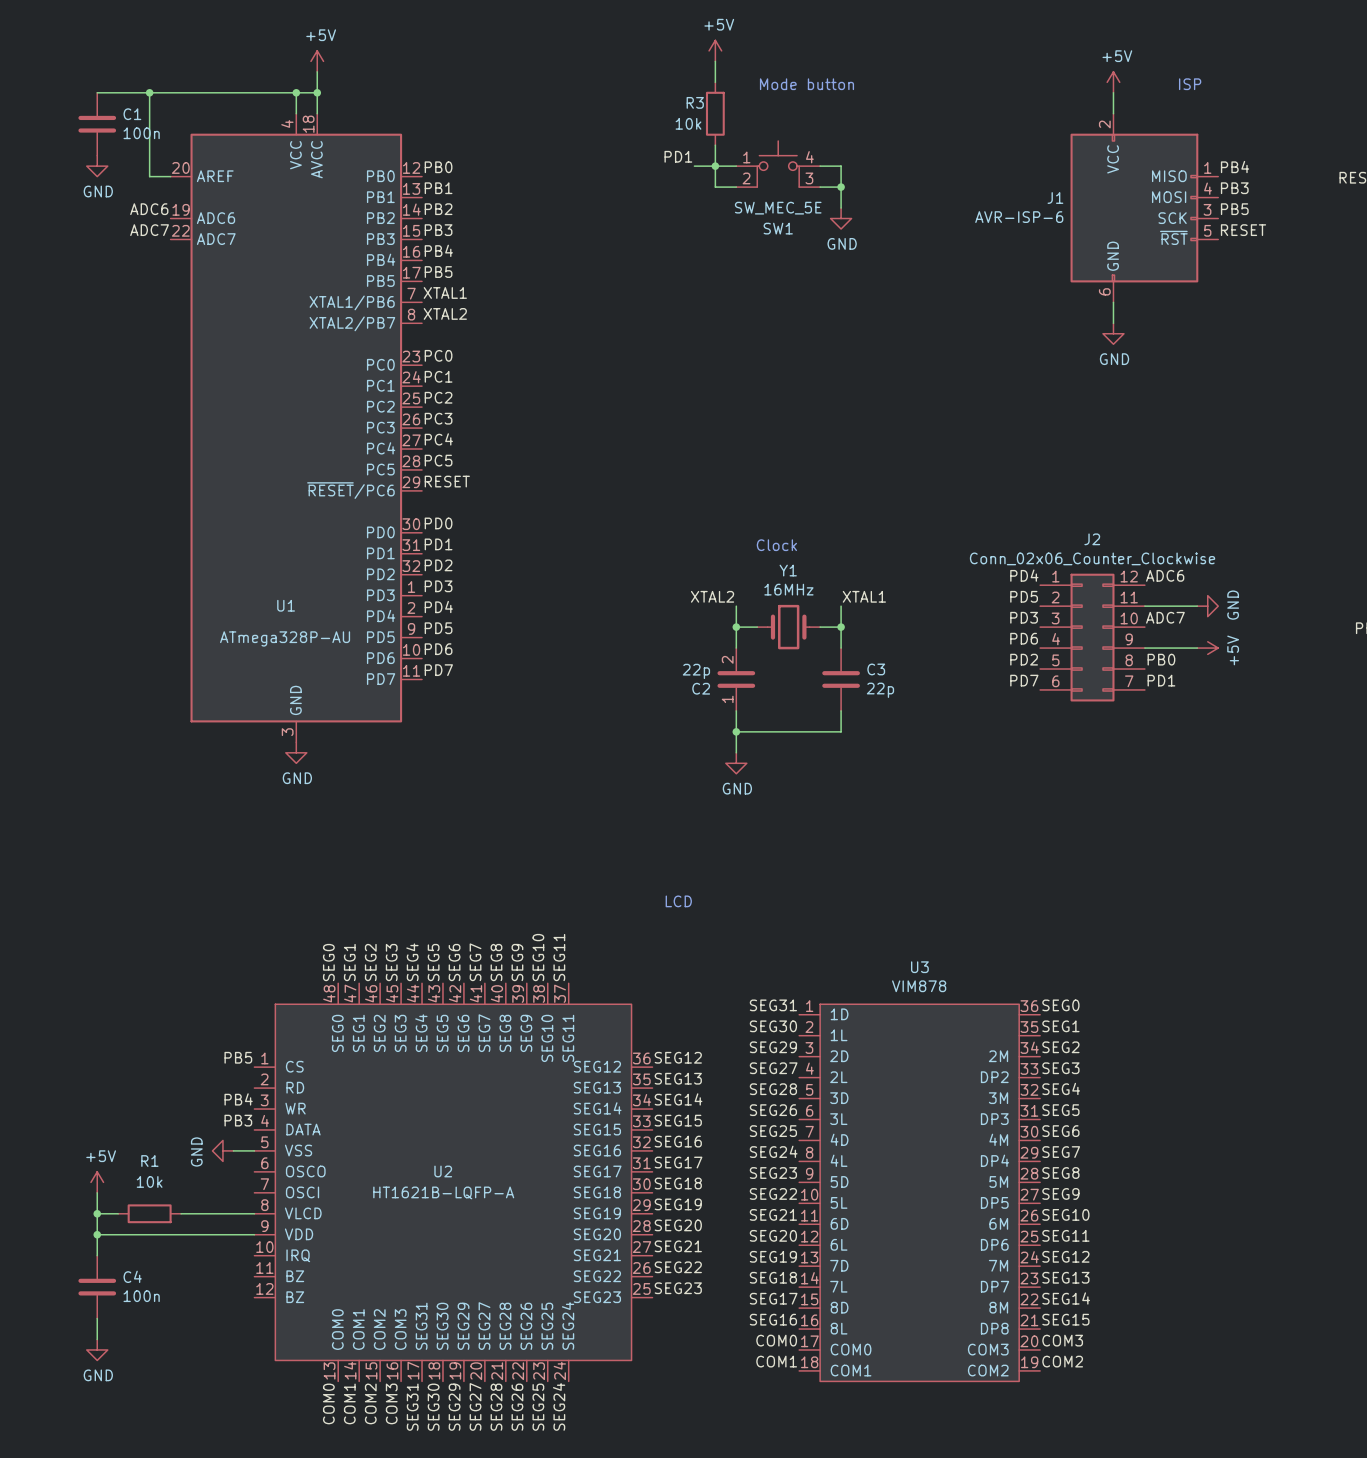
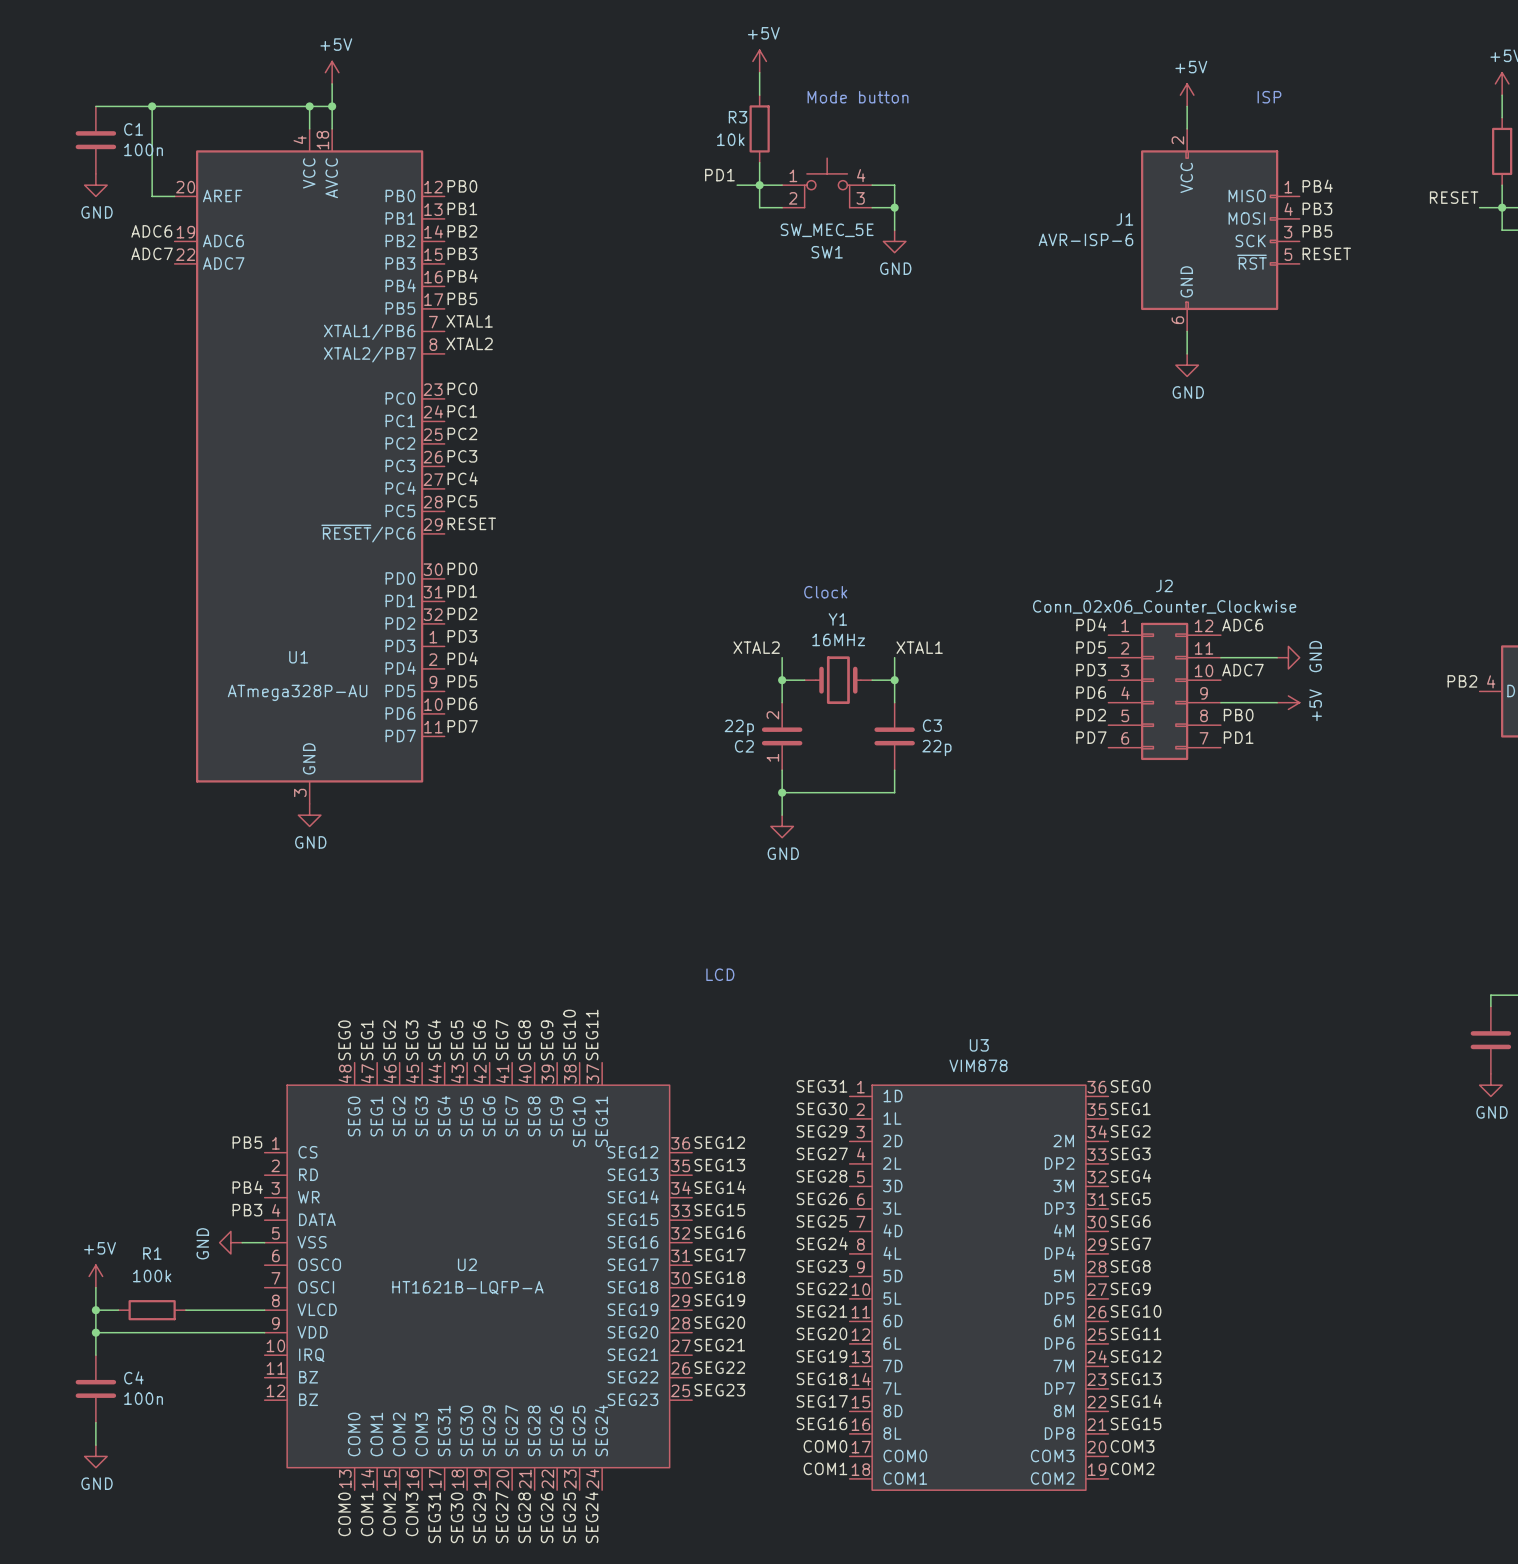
R1 value: 10k (149, 1181) -> 100k (152, 1276)

